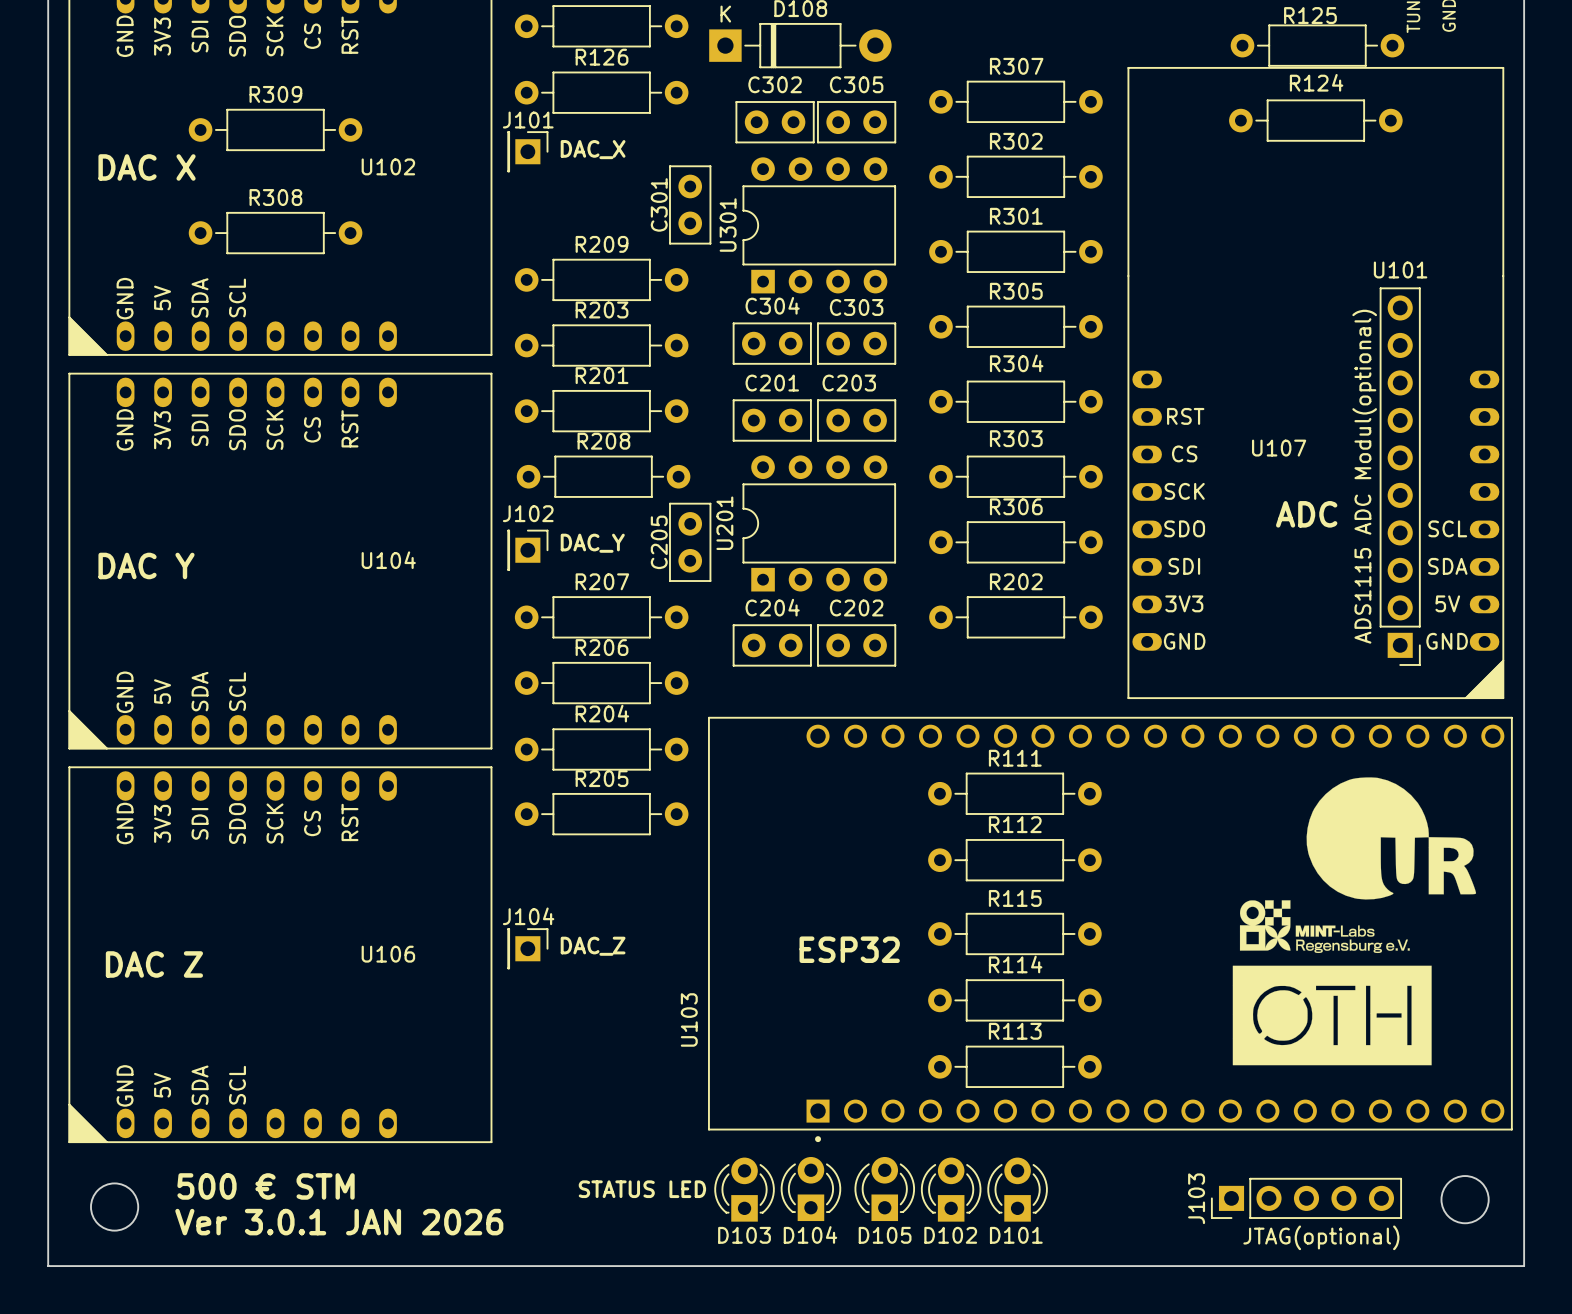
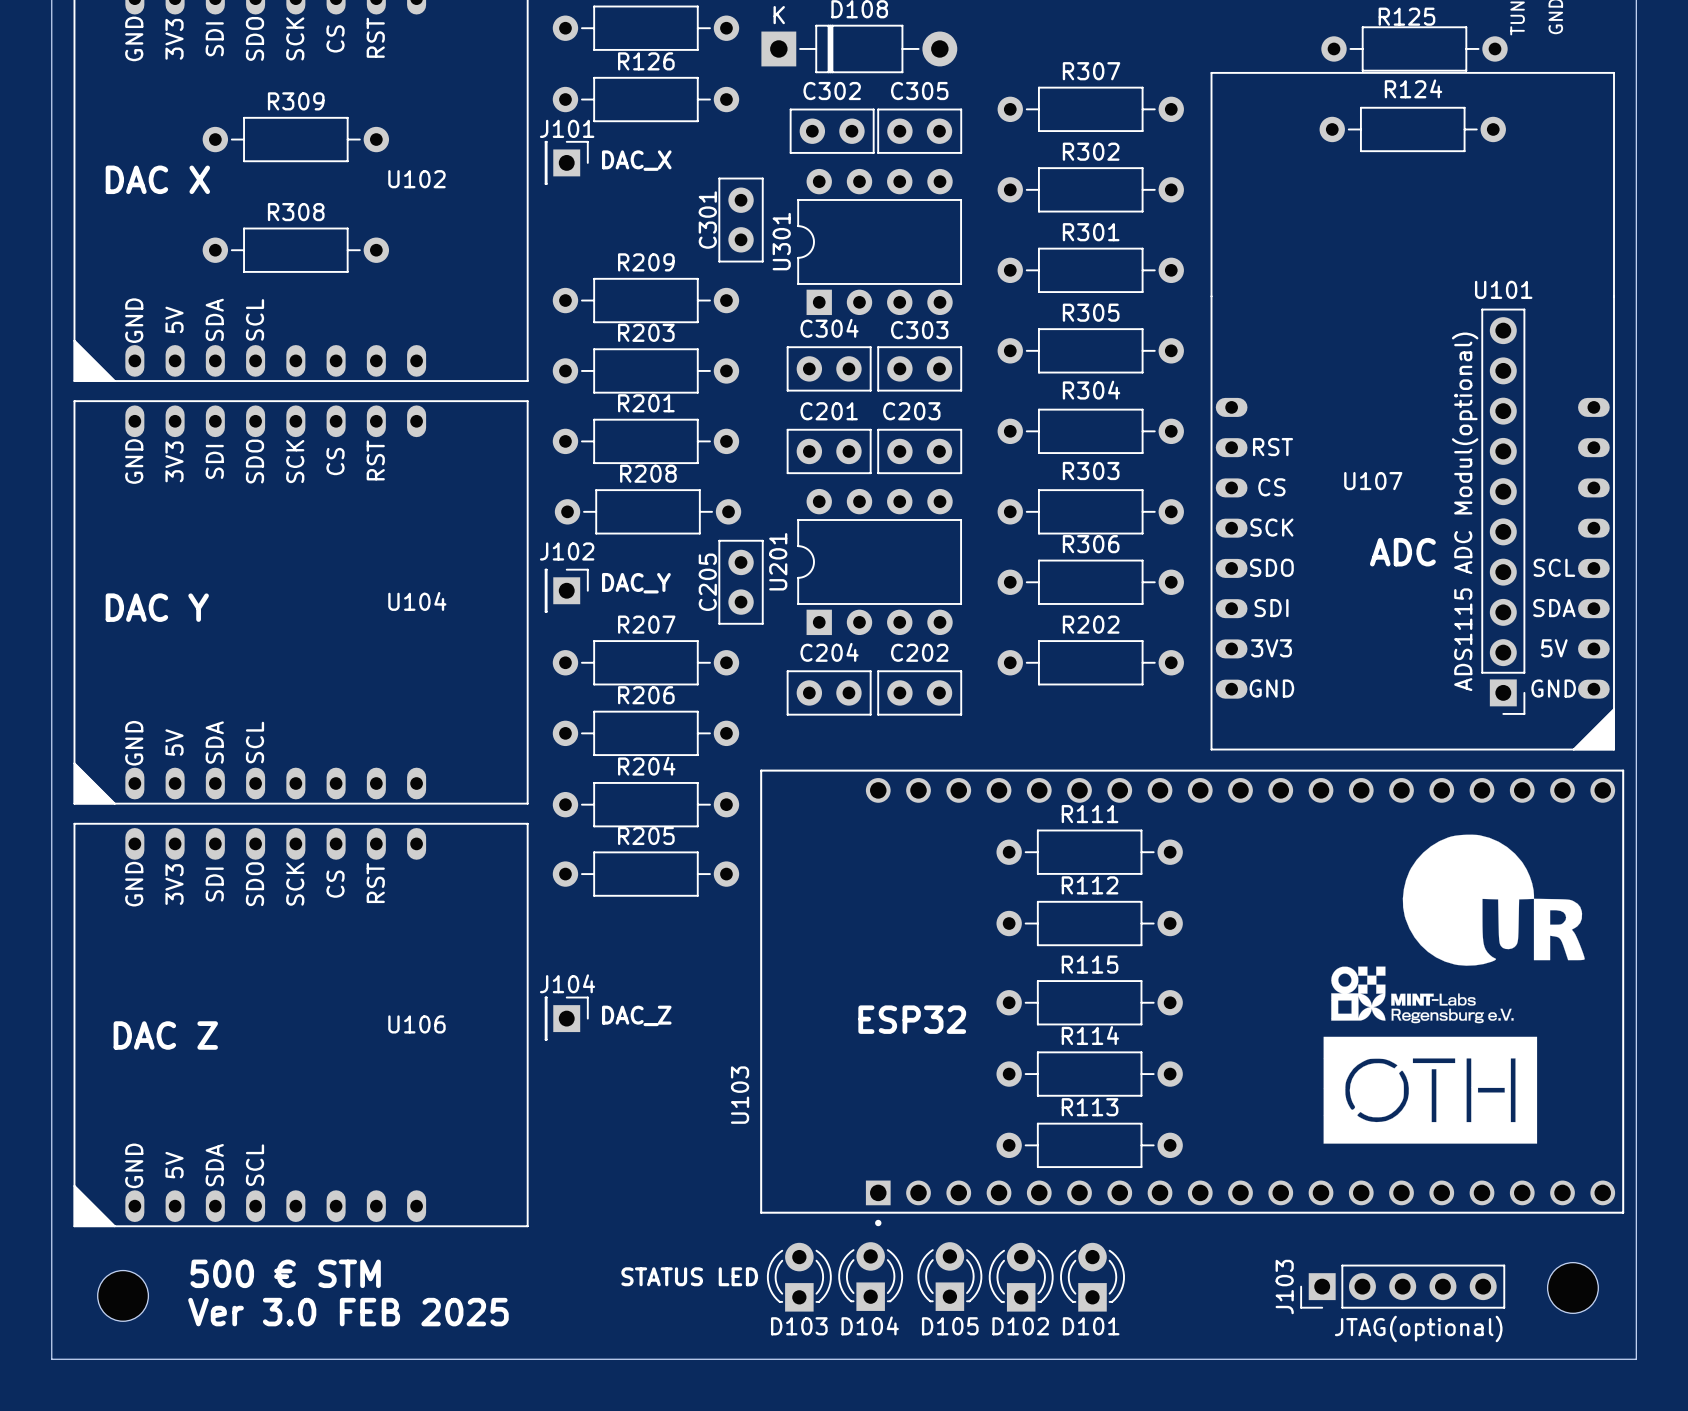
text: Ver 3.0.1 JAN 2026 (339, 1222) -> Ver 3.0 FEB 2025 (348, 1312)

